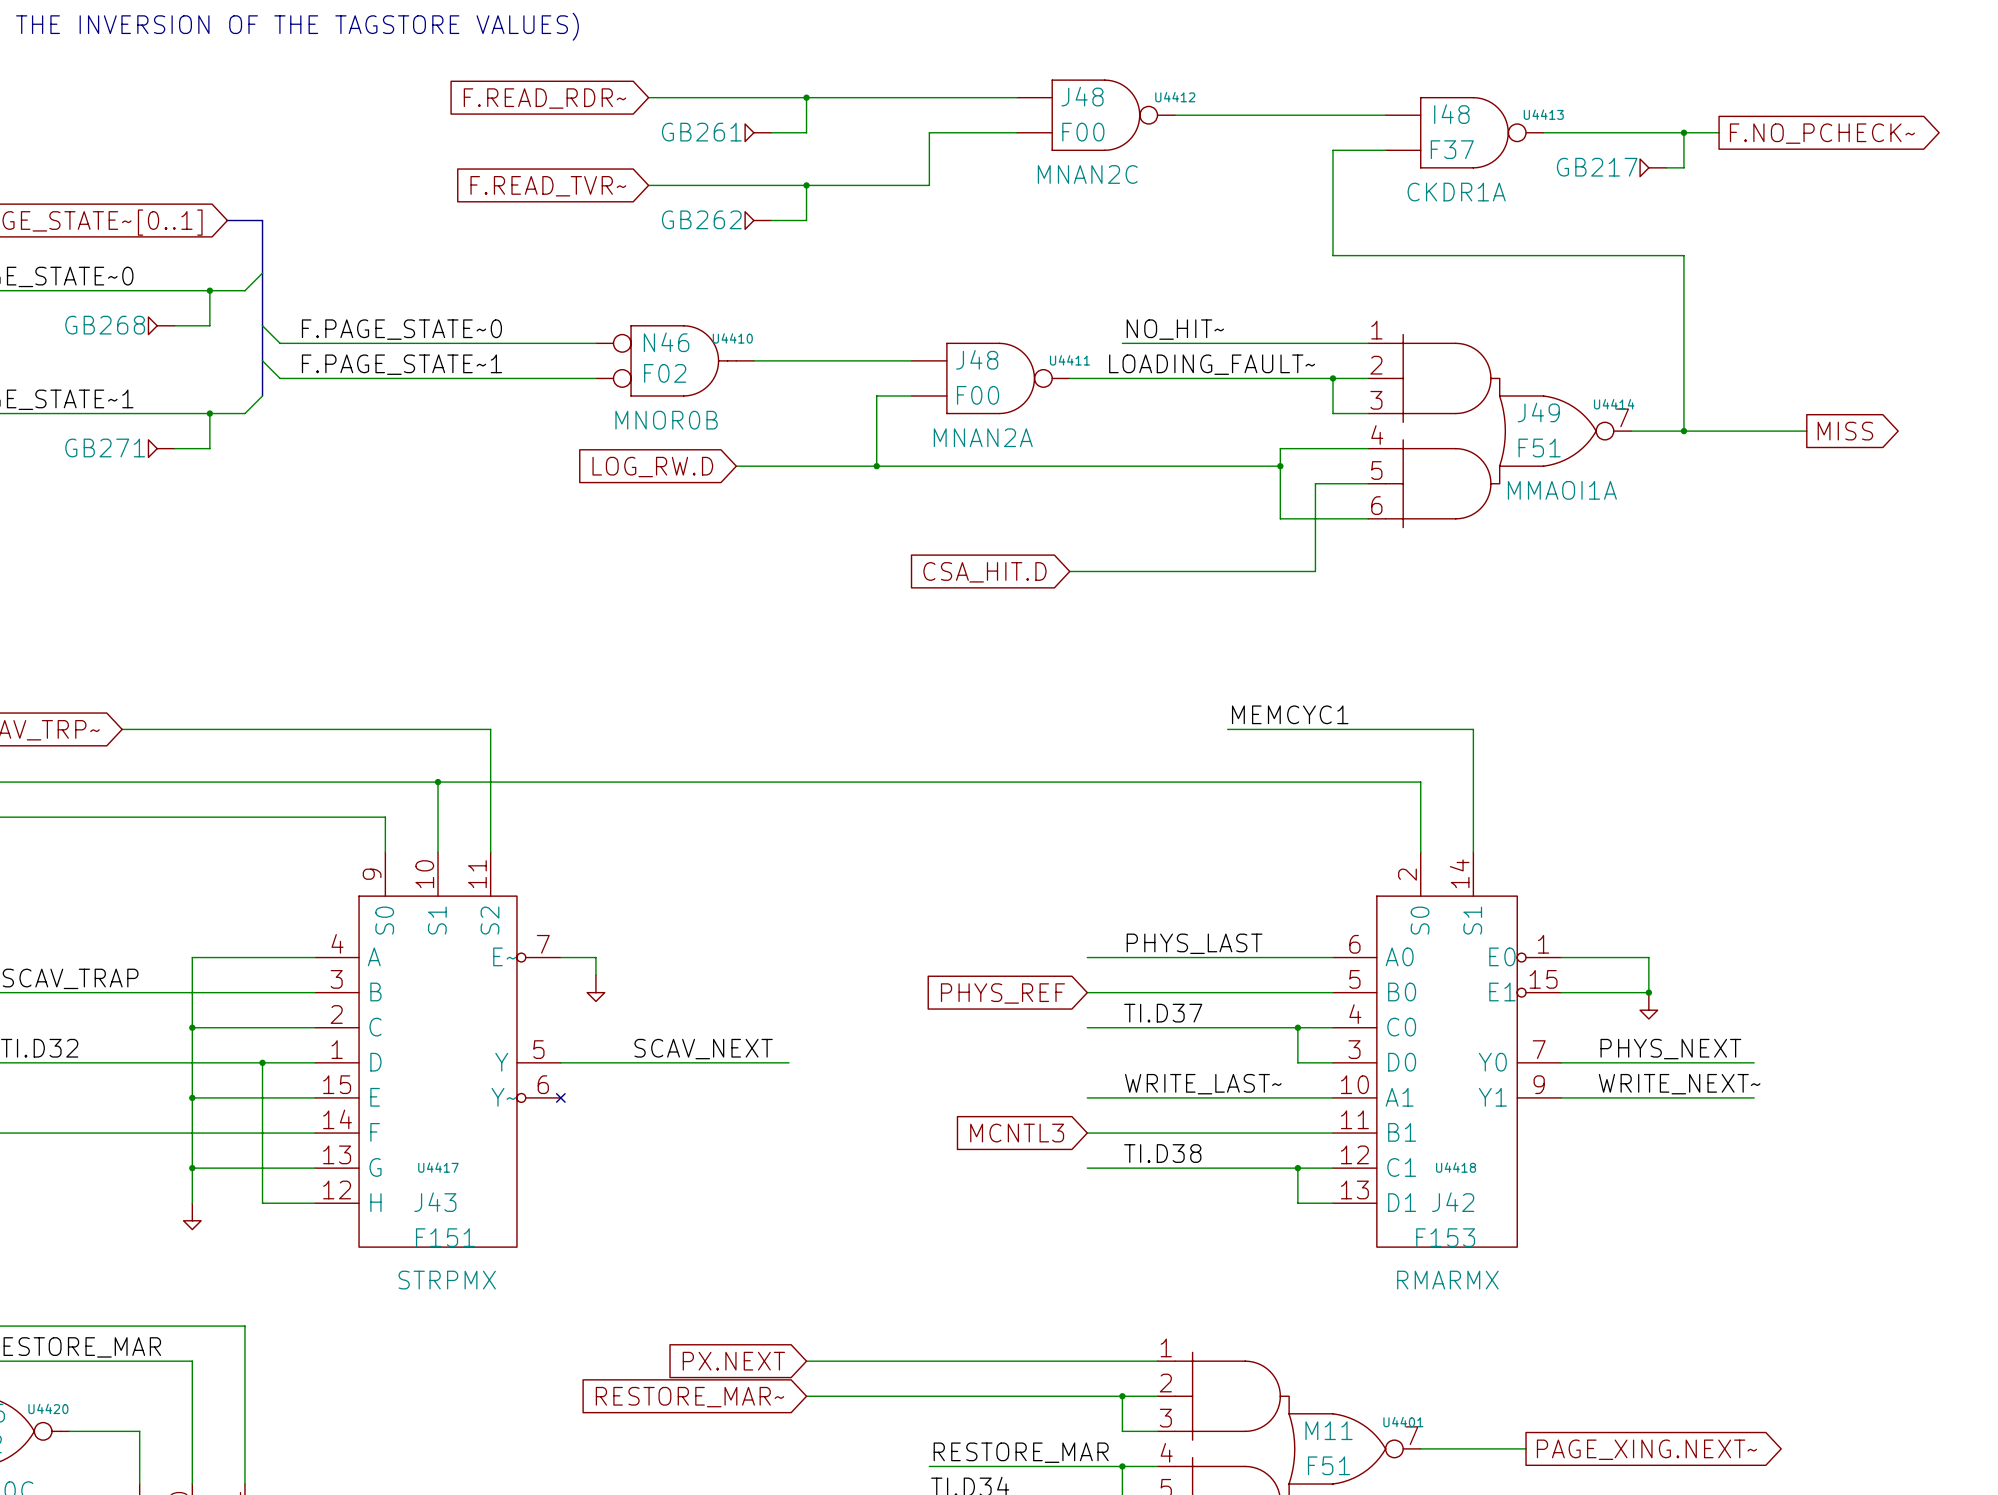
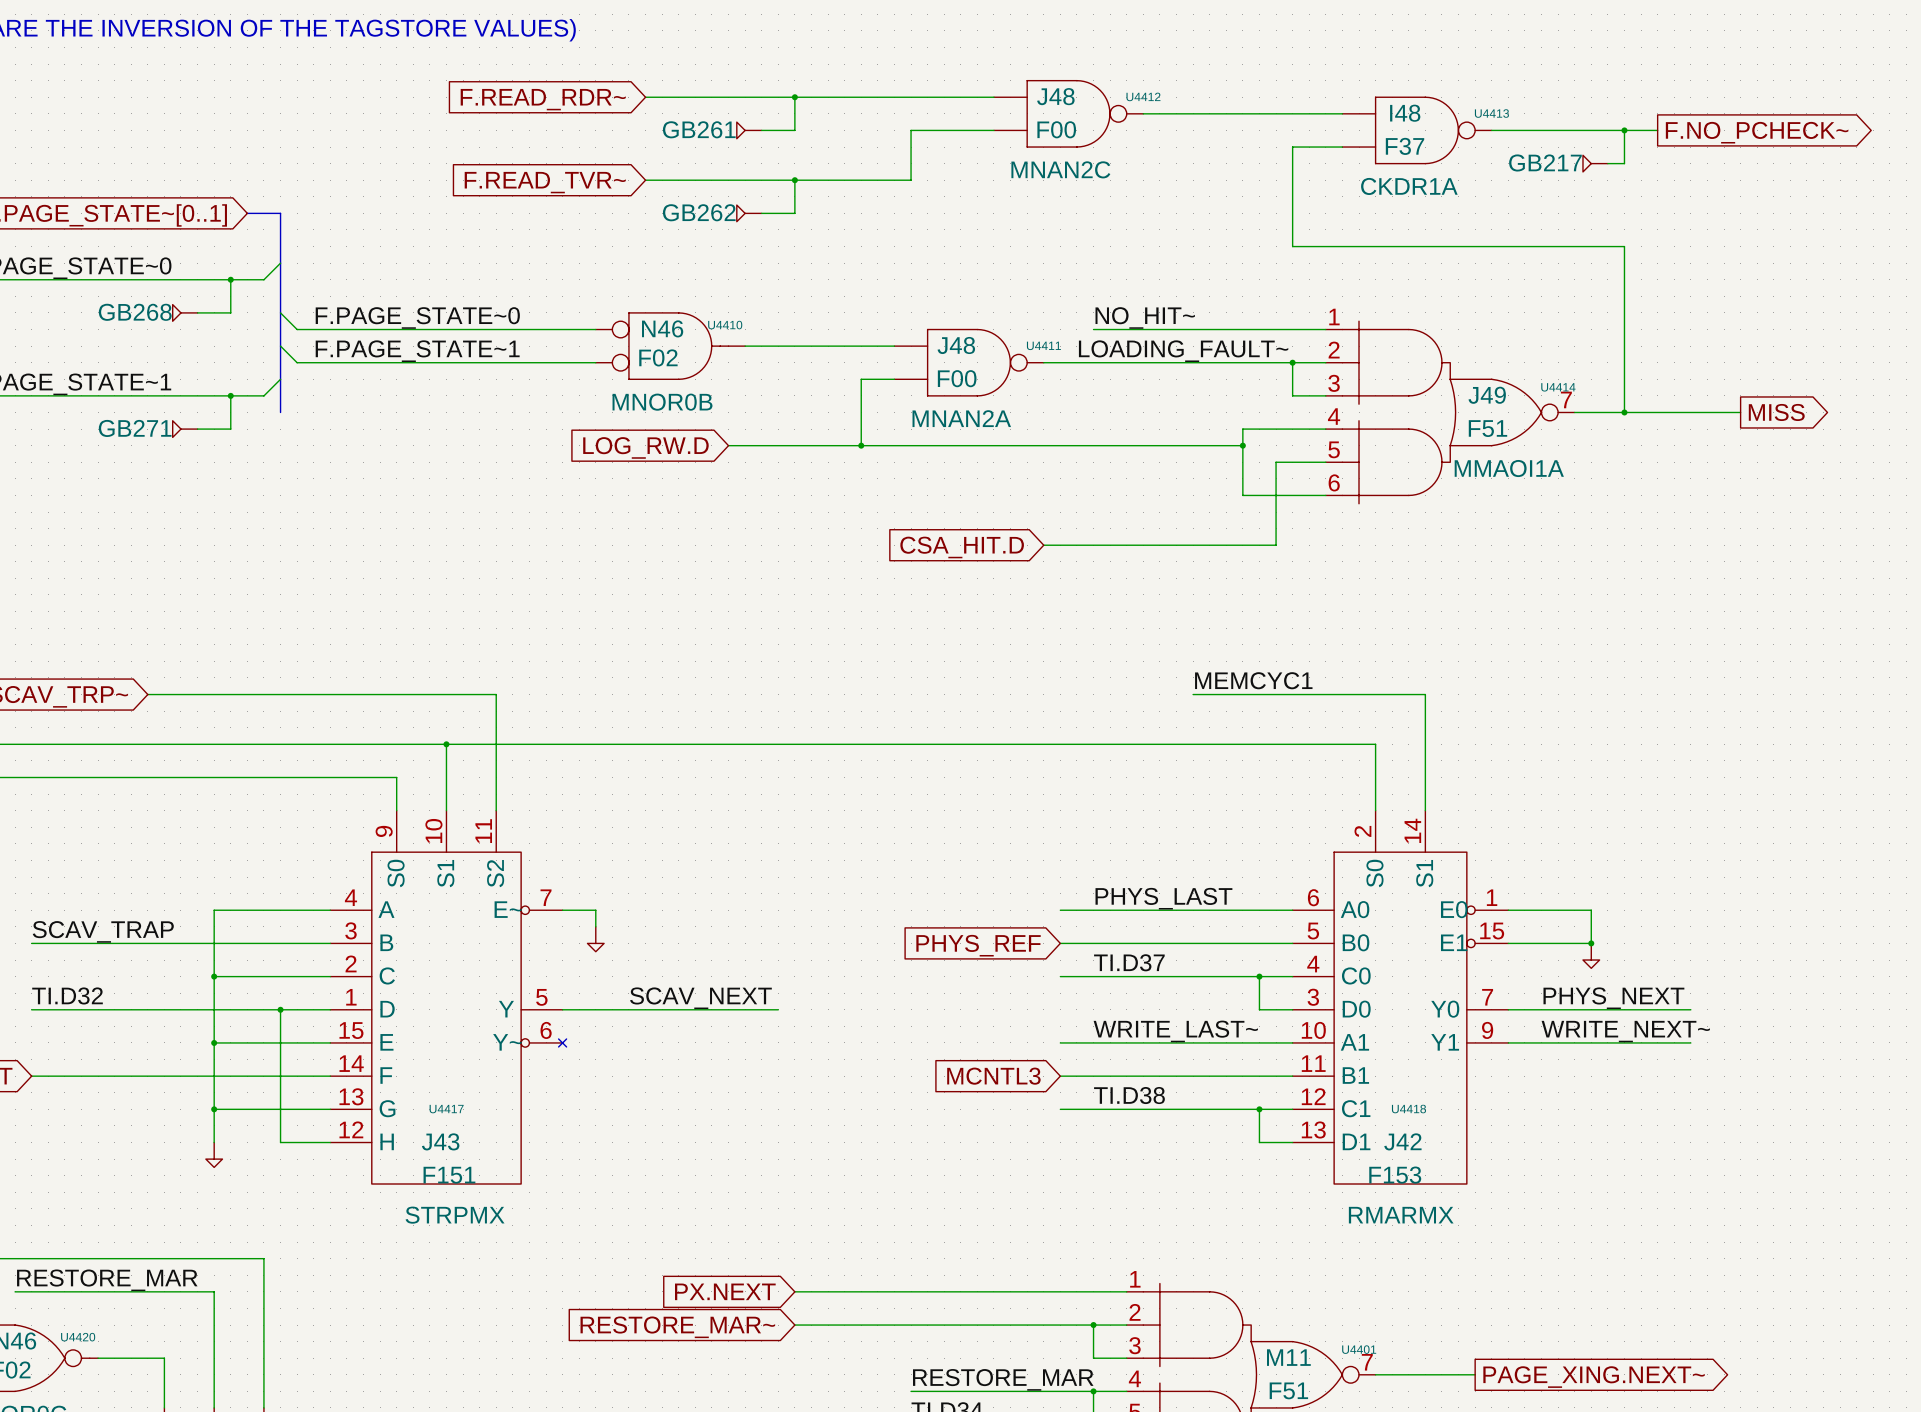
bus: none -> (280, 379) (280, 412)

